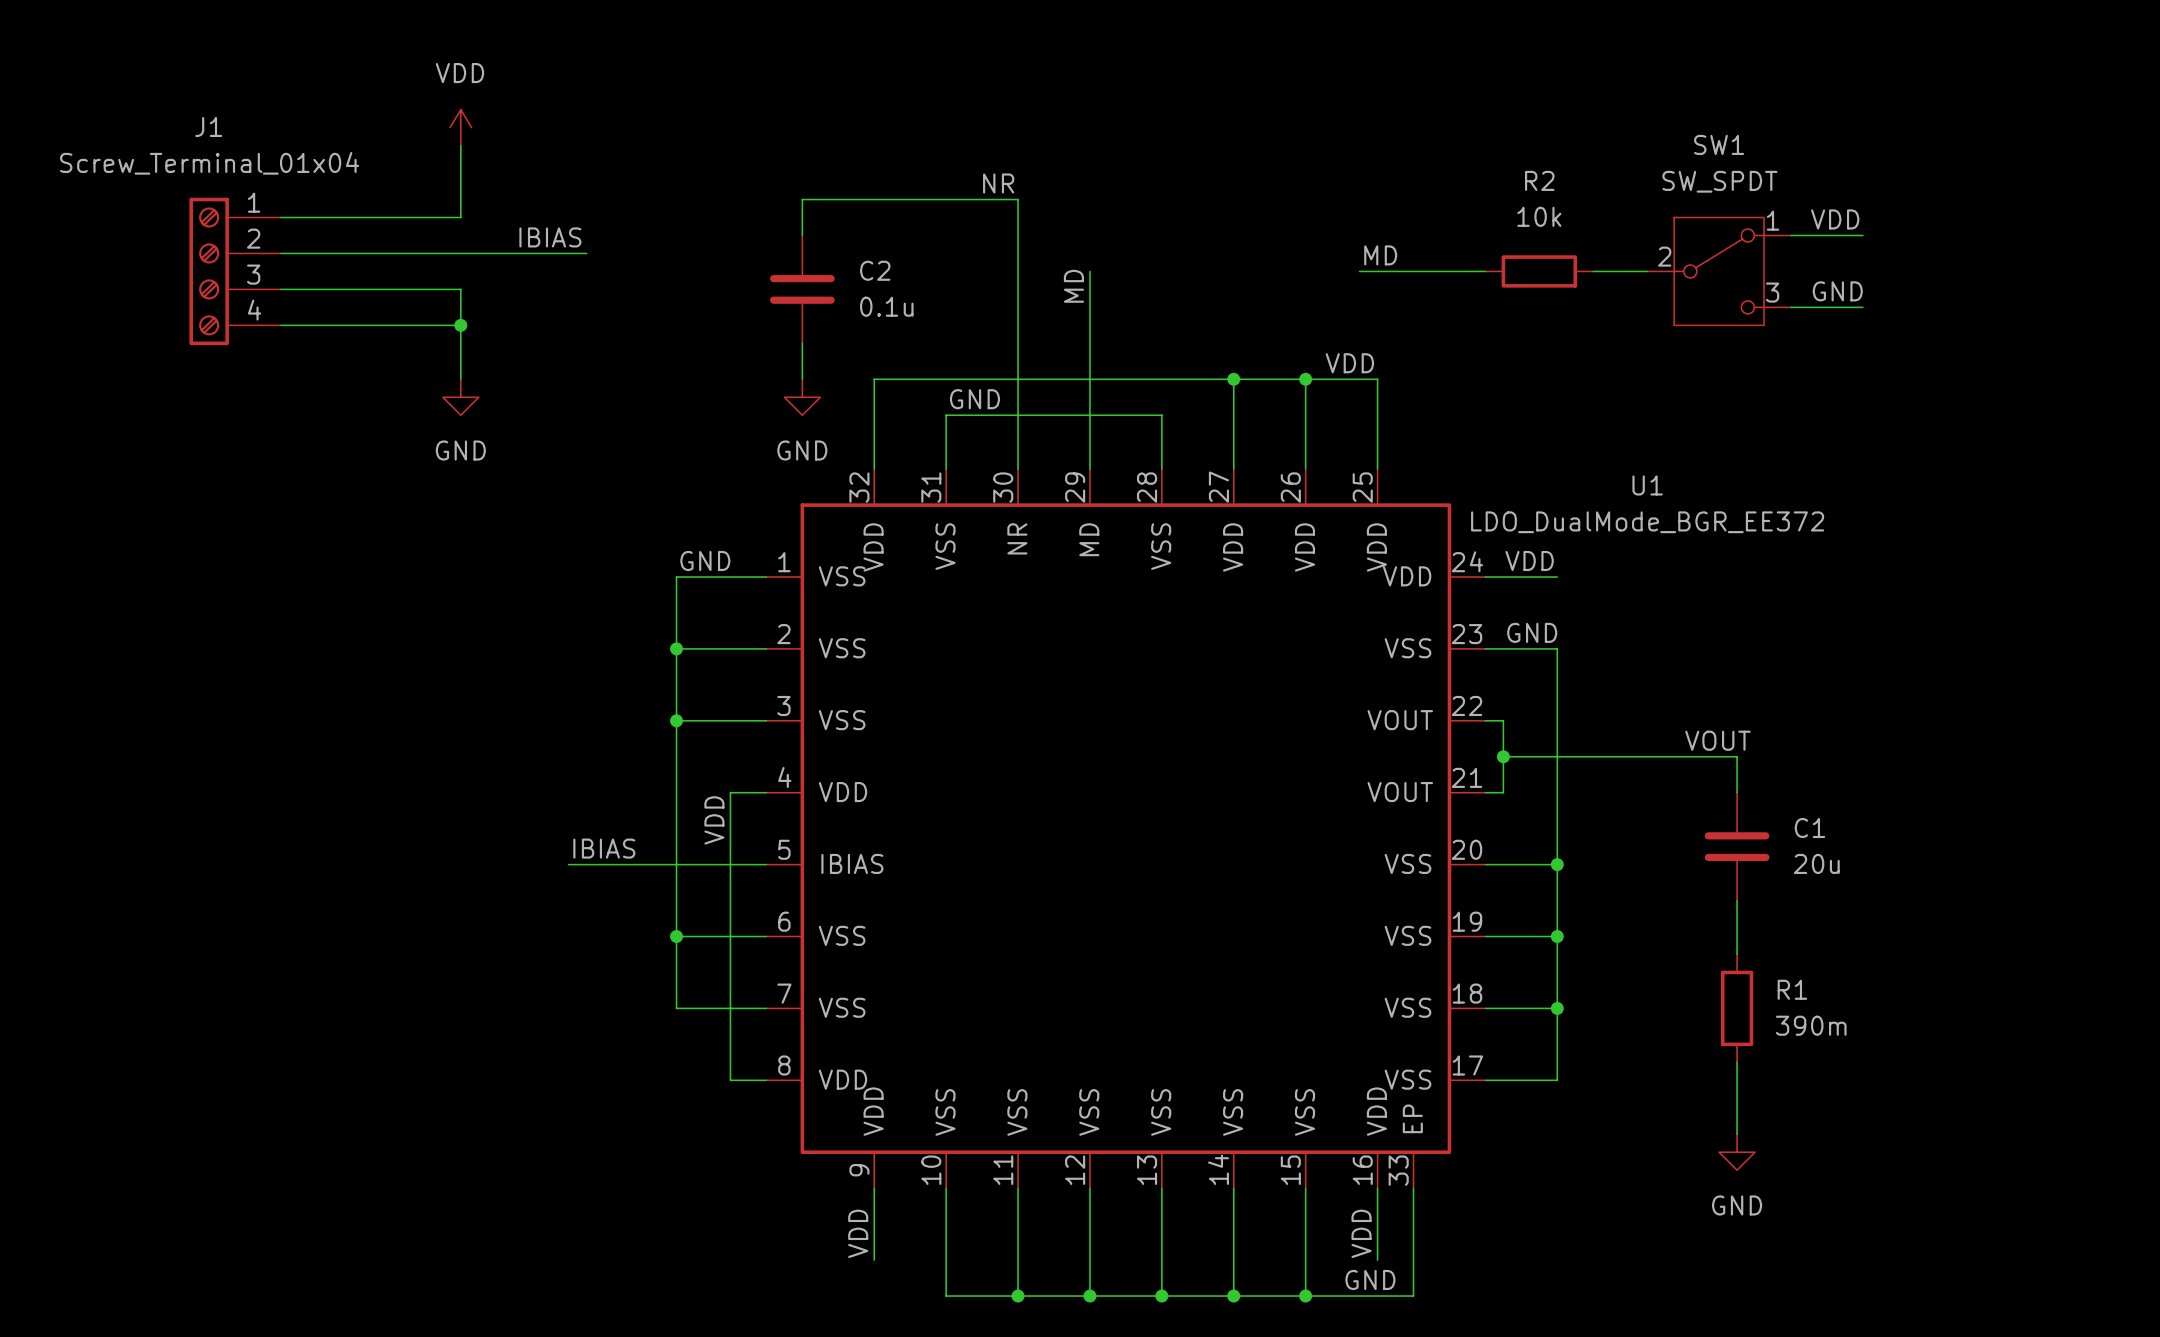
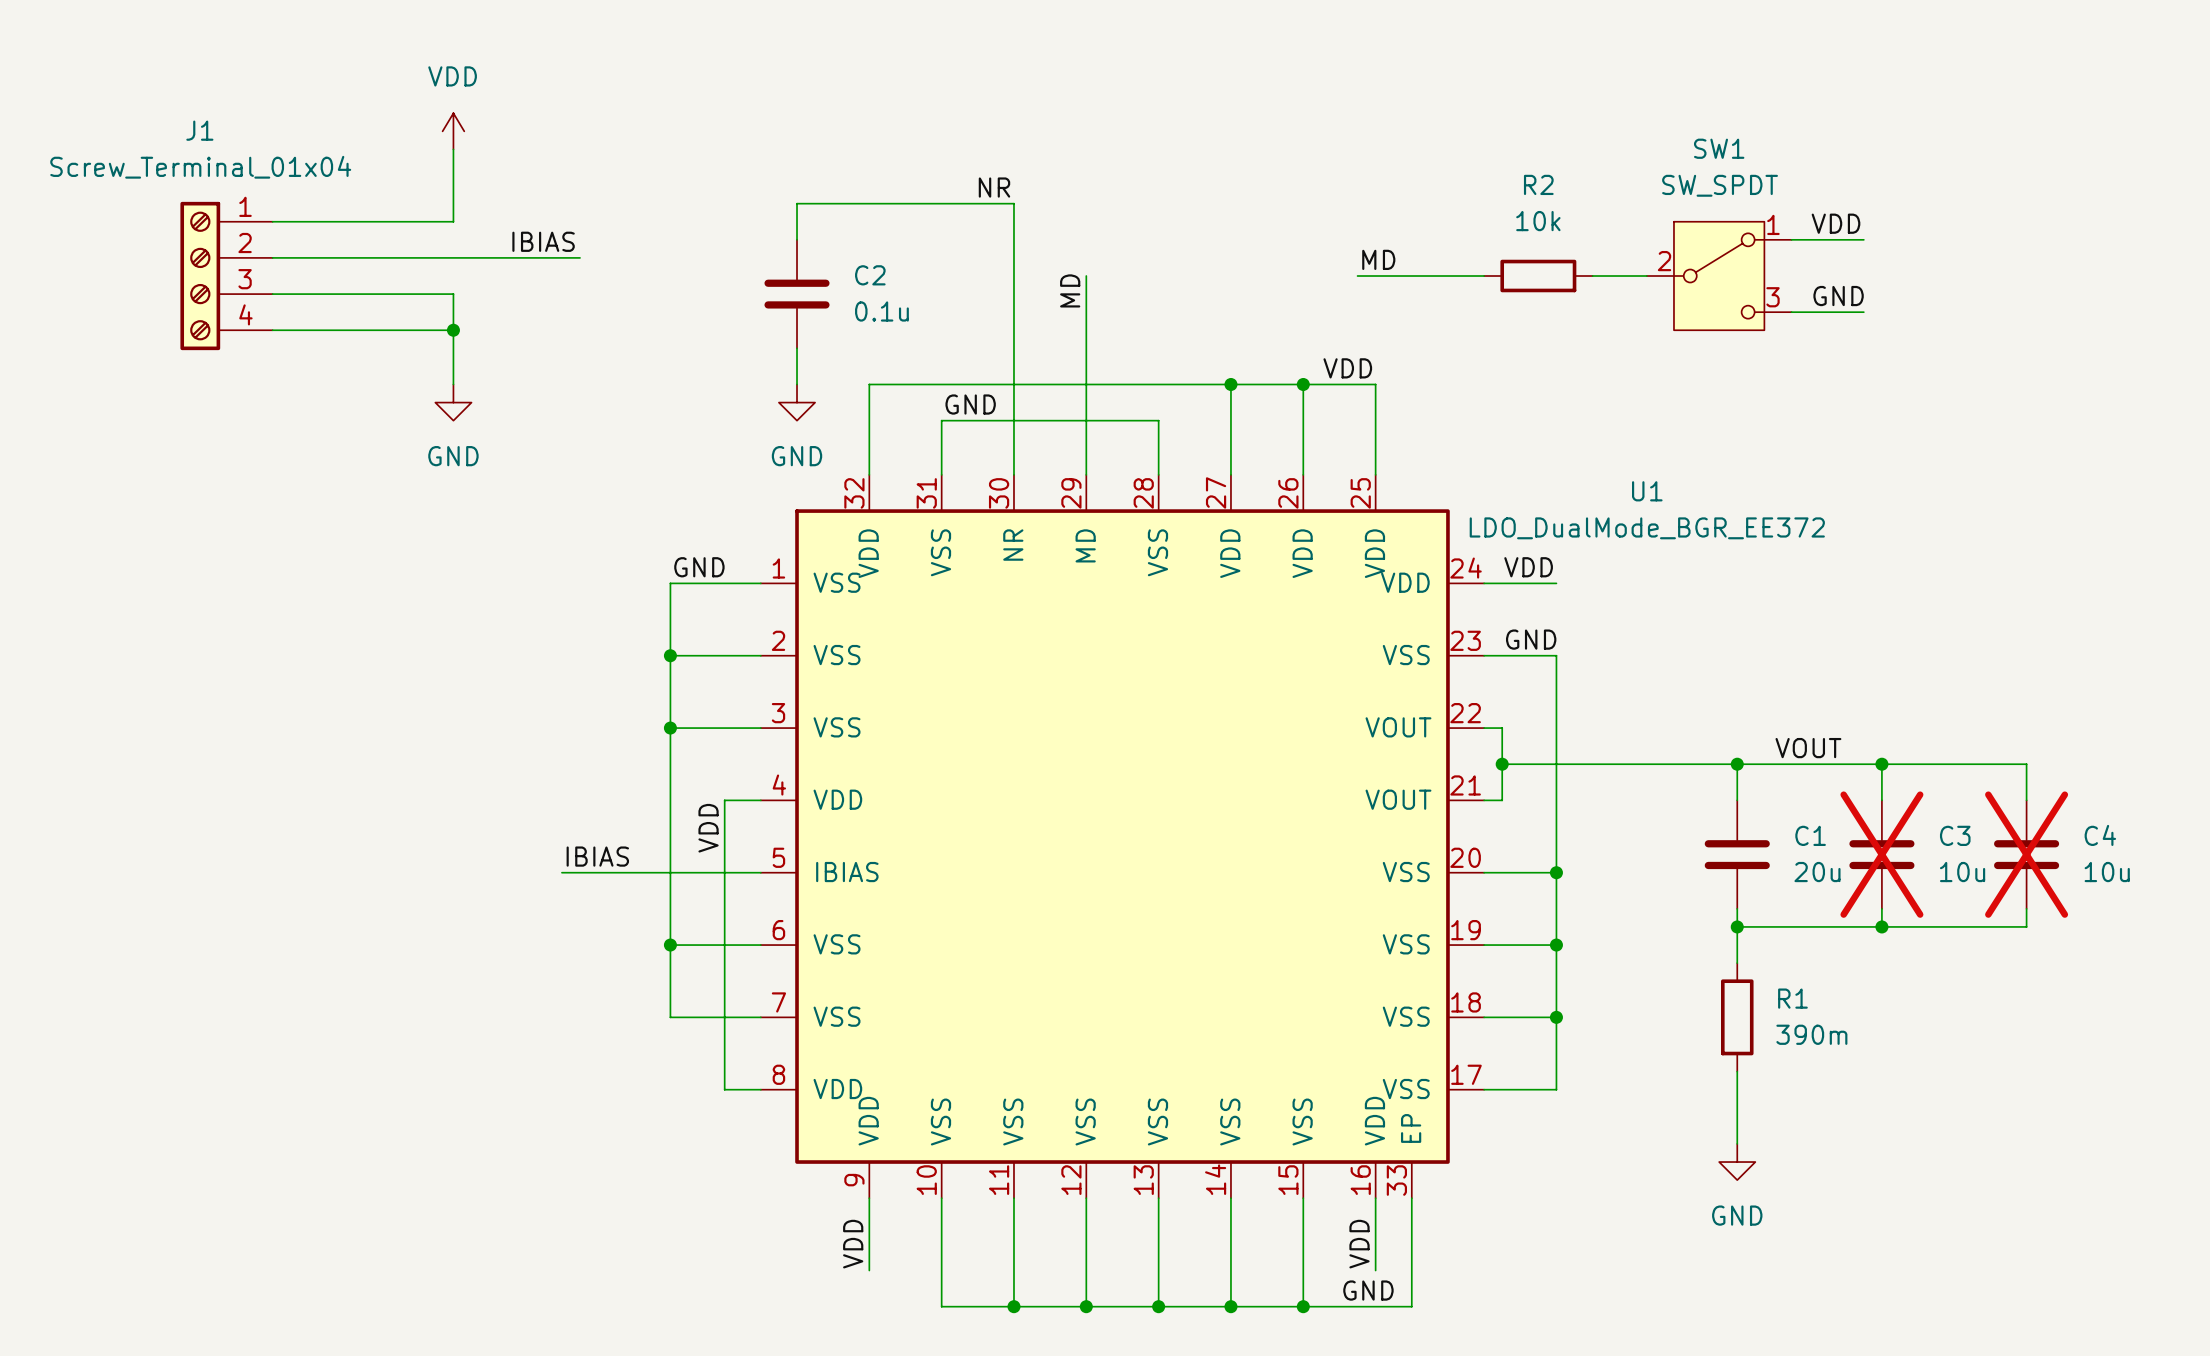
label position: VOUT (1717, 740) -> VOUT (1808, 748)
wire: none -> (1737, 764) (2026, 764) (2026, 800)
junction: none -> (1737, 764)
wire: none -> (1881, 764) (1881, 800)
junction: none -> (1881, 764)
C3: none -> 10u (1881, 854)
C4: none -> 10u (2026, 854)
wire: none -> (1881, 908) (1881, 926)
wire: none -> (2026, 908) (2026, 926) (1737, 926)
junction: none -> (1737, 926)
junction: none -> (1881, 926)

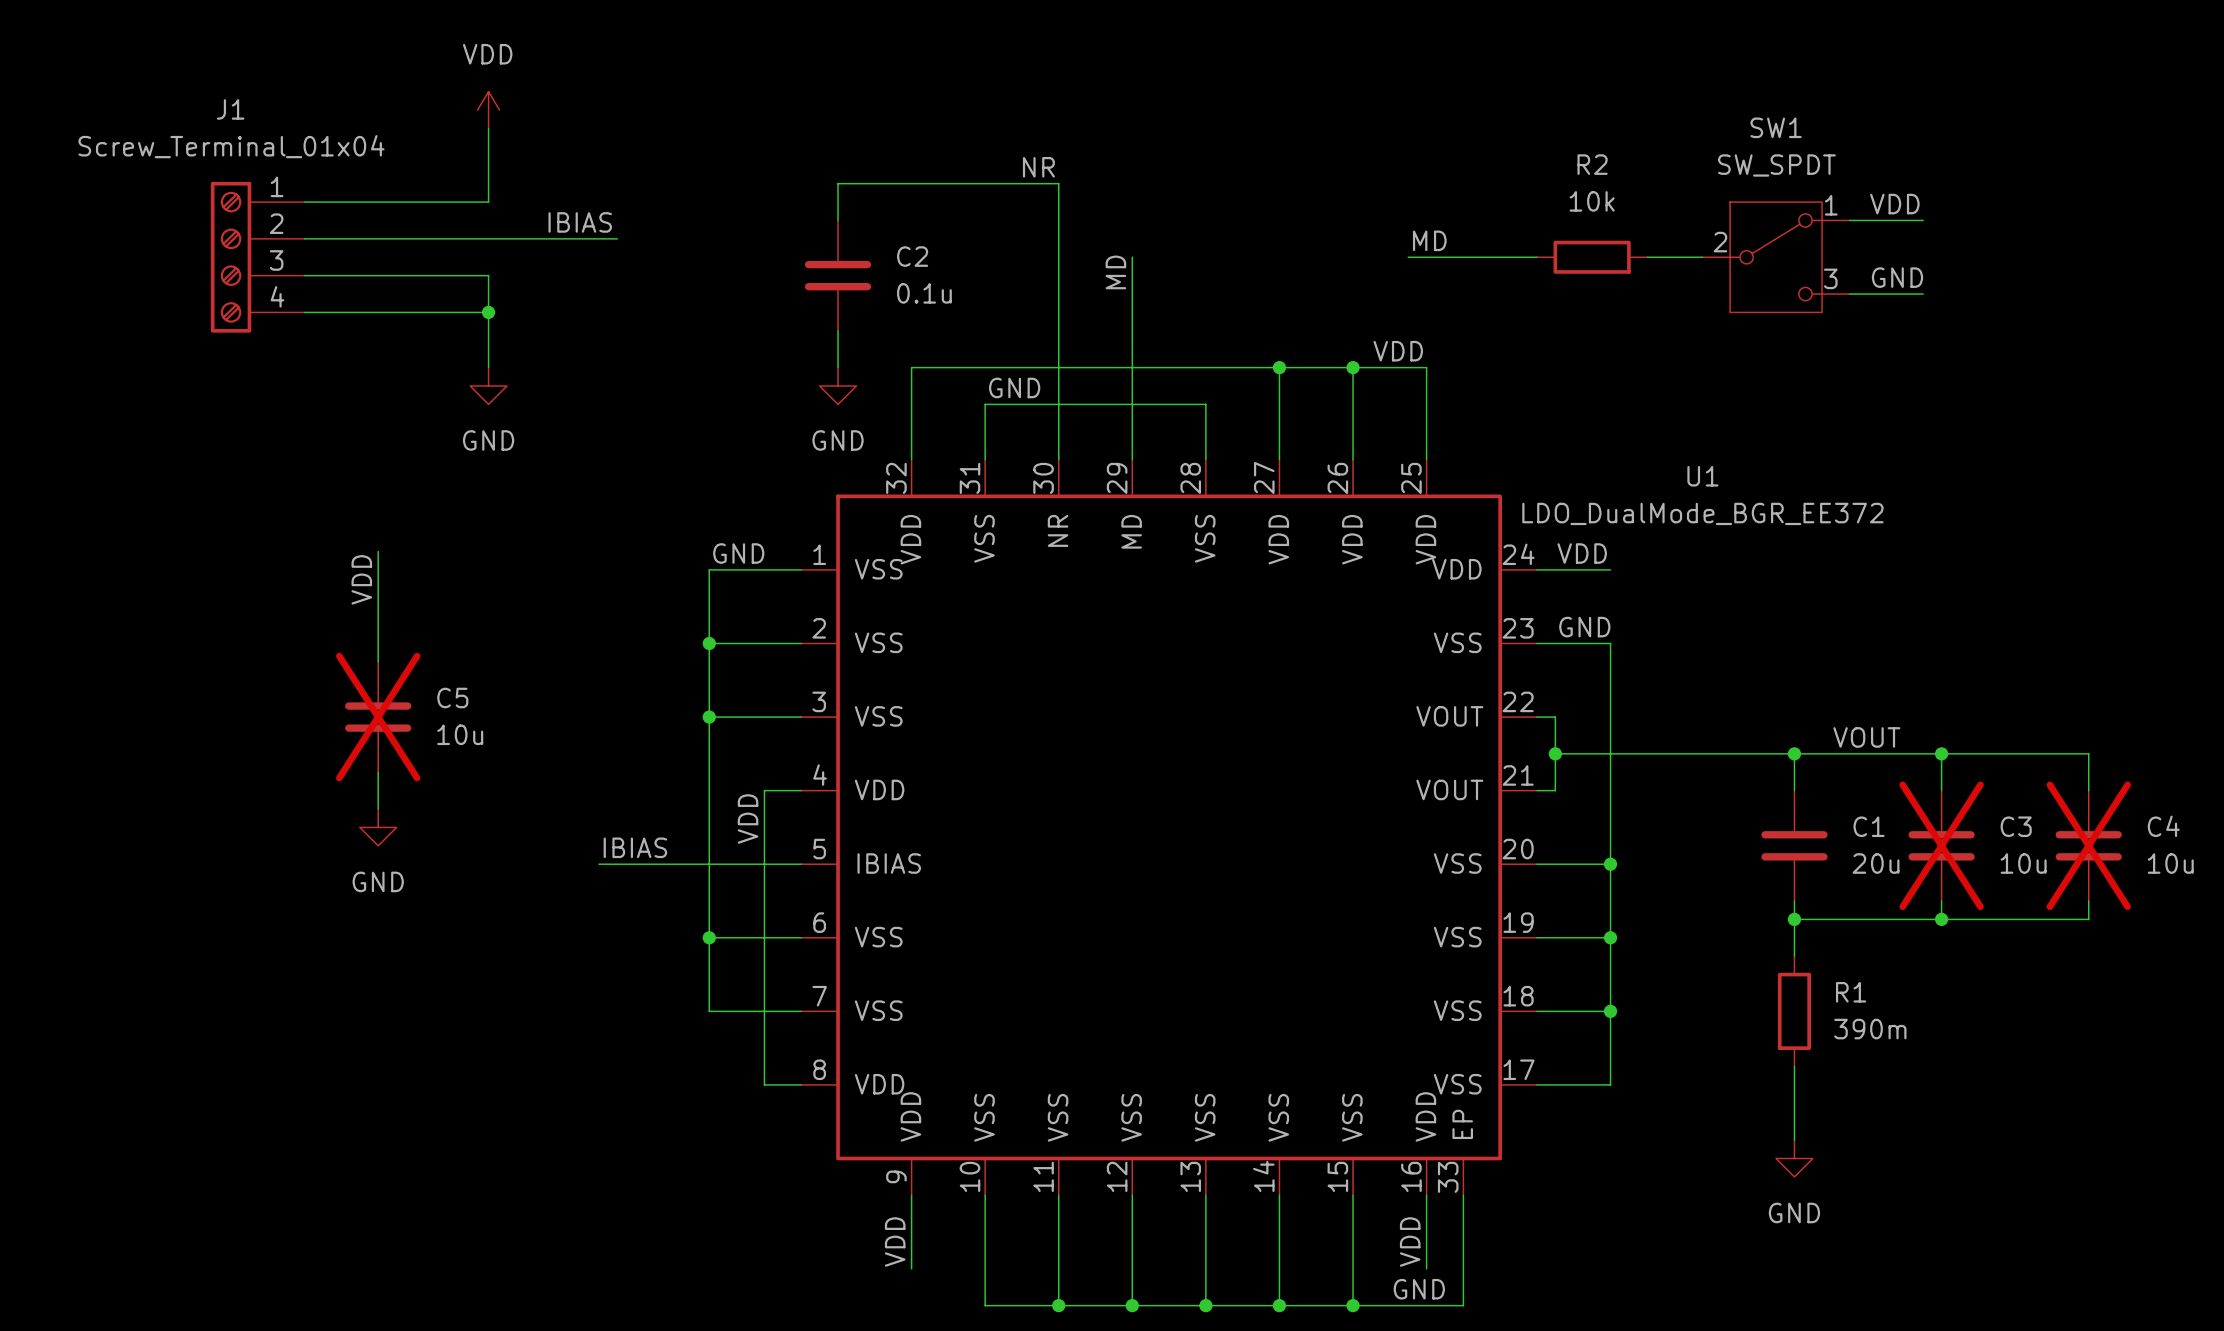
wire: none -> (378, 551) (378, 661)
label: none -> VDD (361, 579)
C5: none -> 10u (378, 717)
wire: none -> (378, 772) (378, 809)
power symbol: none -> GND (378, 827)

